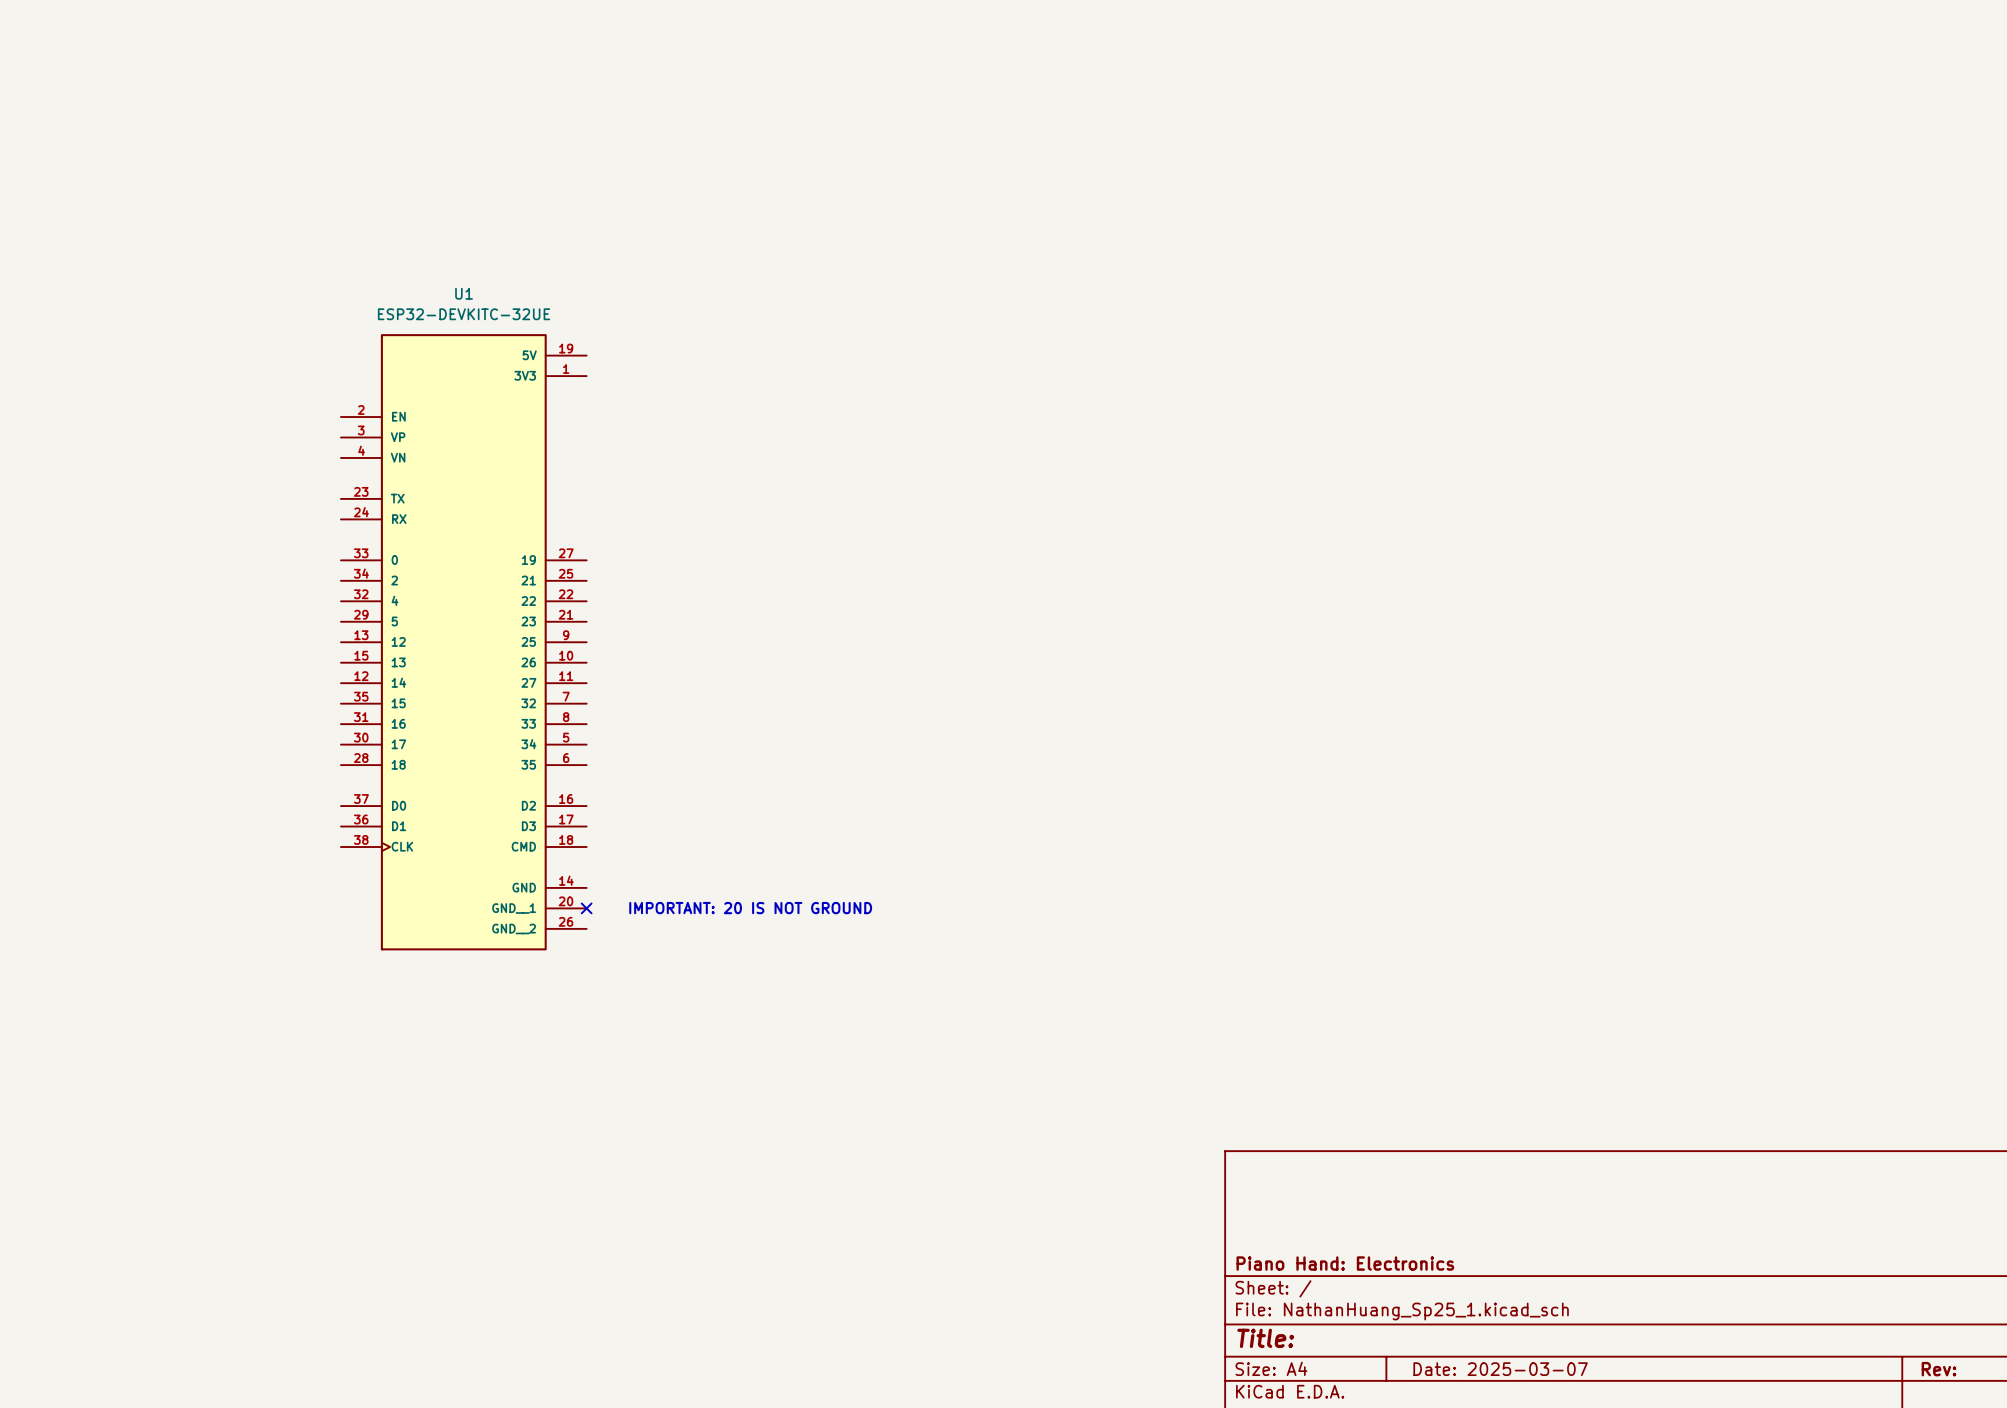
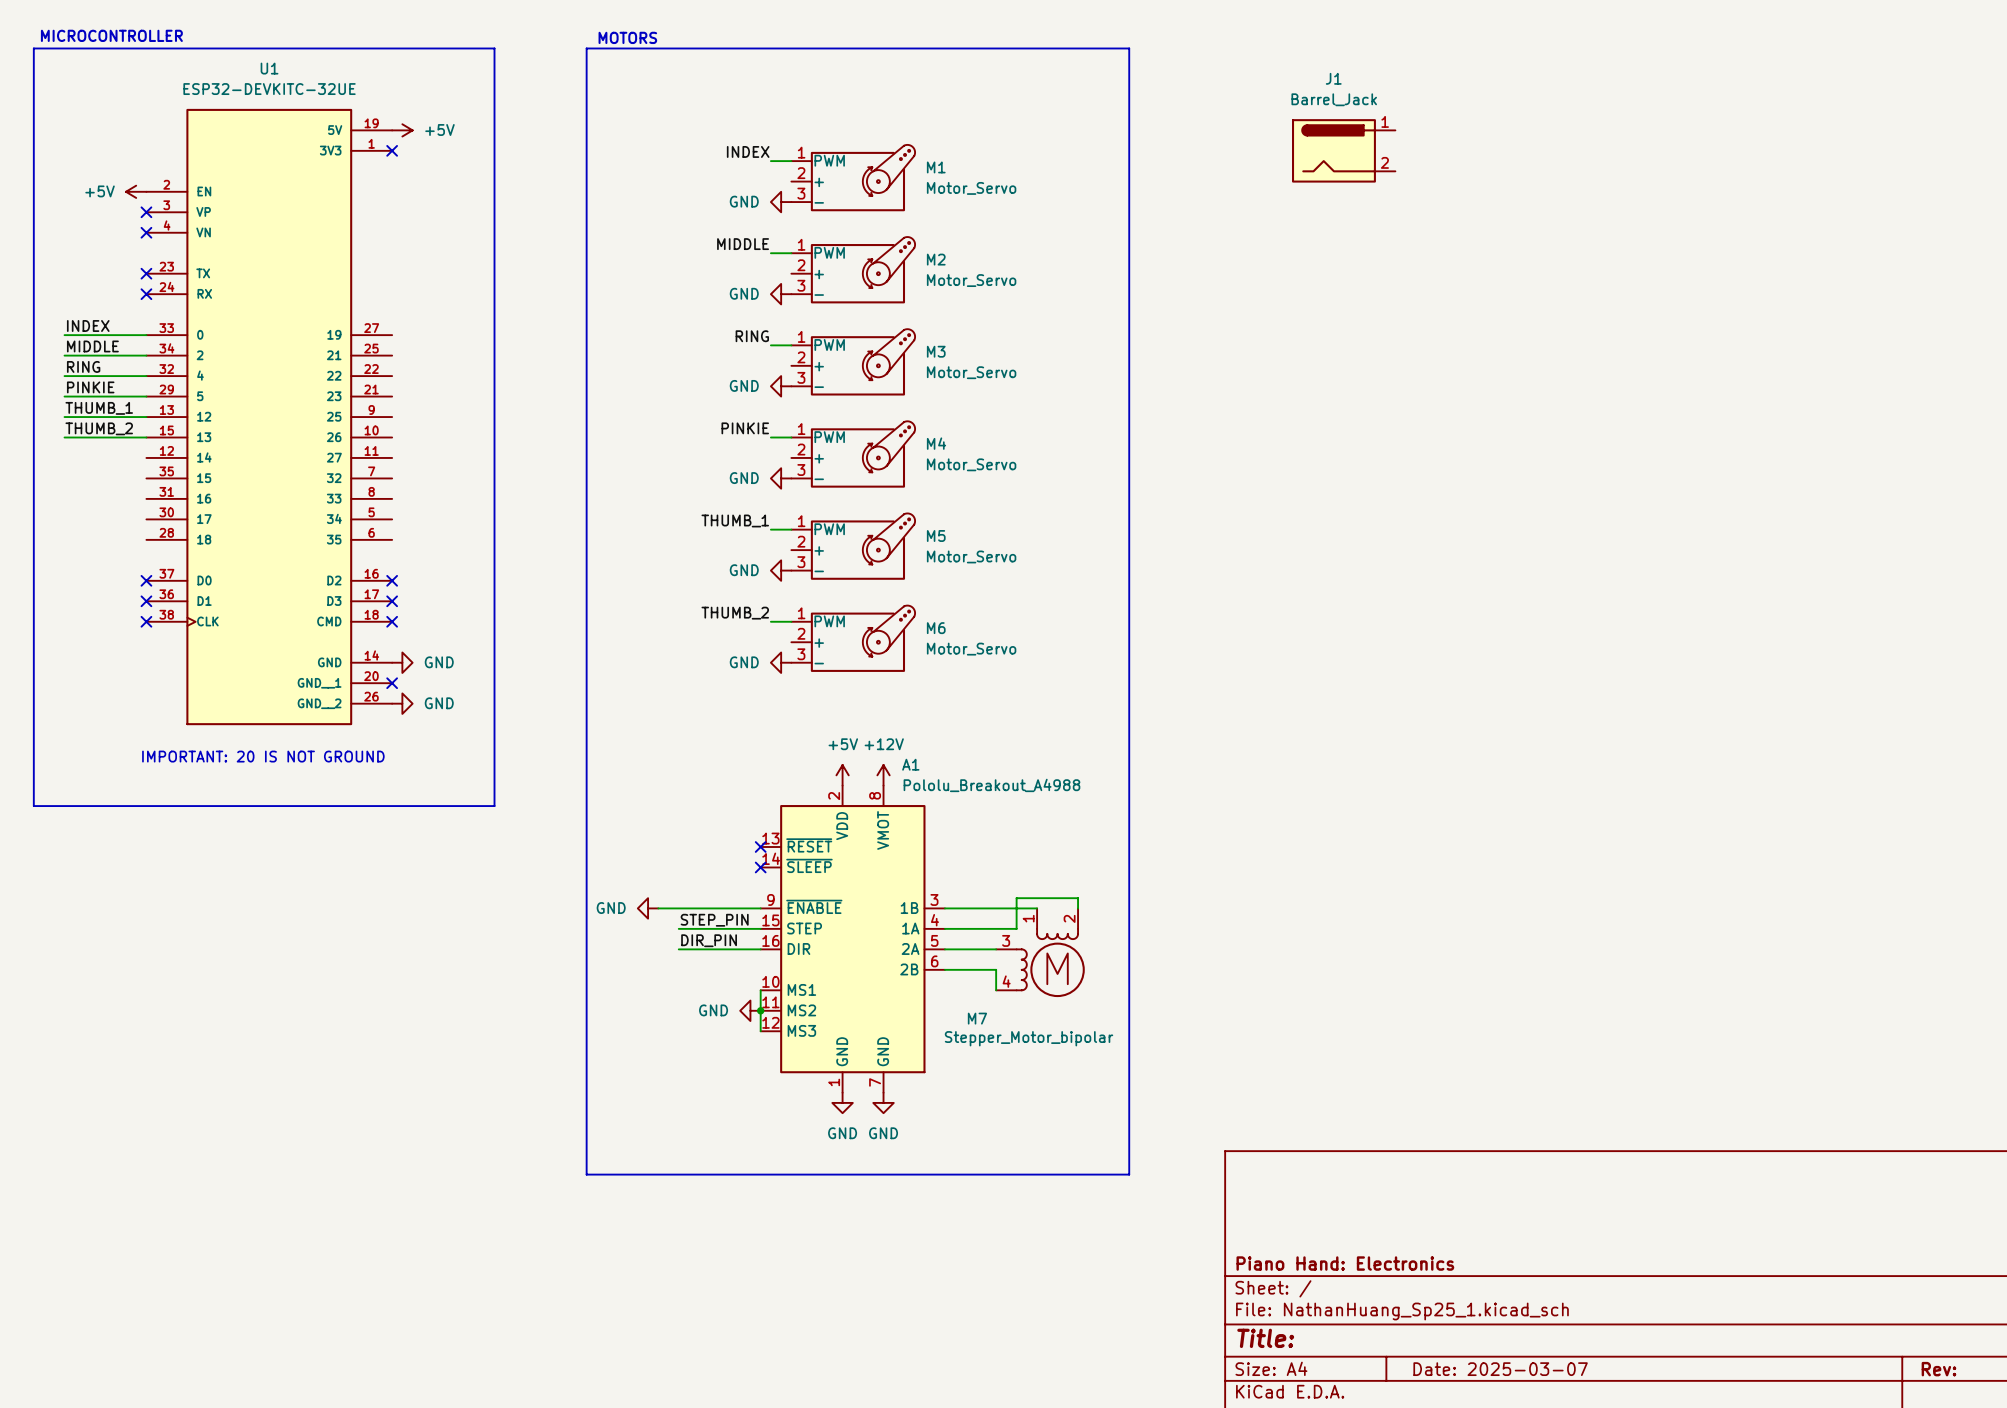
text: none -> MICROCONTROLLER (111, 35)
text: none -> MOTORS (627, 37)
line: none -> (33, 48) (494, 48) (494, 806) (33, 806) (33, 48)
line: none -> (586, 48) (1129, 48) (1129, 1174) (586, 1174) (586, 48)
power symbol: none -> +5V (402, 130)
no-connect mark: none -> (392, 150)
J1: none -> Barrel_Jack (1343, 150)
label: none -> INDEX (748, 151)
wire: none -> (770, 161) (791, 161)
M1: none -> Motor_Servo (853, 178)
power symbol: none -> +5V (136, 191)
power symbol: none -> GND (781, 202)
no-connect mark: none -> (146, 212)
no-connect mark: none -> (146, 232)
label: none -> MIDDLE (743, 244)
wire: none -> (770, 253) (791, 253)
M2: none -> Motor_Servo (853, 270)
no-connect mark: none -> (146, 273)
no-connect mark: none -> (146, 294)
power symbol: none -> GND (781, 294)
label: none -> INDEX (88, 325)
wire: none -> (64, 335) (146, 335)
label: none -> RING (752, 336)
wire: none -> (770, 345) (791, 345)
label: none -> MIDDLE (92, 346)
wire: none -> (64, 355) (146, 355)
M3: none -> Motor_Servo (853, 362)
label: none -> RING (83, 366)
wire: none -> (64, 376) (146, 376)
power symbol: none -> GND (781, 386)
label: none -> PINKIE (90, 387)
wire: none -> (64, 396) (146, 396)
label: none -> THUMB_1 (99, 408)
wire: none -> (64, 417) (146, 417)
label: none -> THUMB_2 (99, 428)
label: none -> PINKIE (745, 428)
wire: none -> (64, 437) (146, 437)
wire: none -> (770, 437) (791, 437)
M4: none -> Motor_Servo (853, 454)
power symbol: none -> GND (781, 478)
label: none -> THUMB_1 (735, 520)
wire: none -> (770, 529) (791, 529)
M5: none -> Motor_Servo (853, 546)
power symbol: none -> GND (781, 570)
no-connect mark: none -> (146, 580)
no-connect mark: none -> (392, 580)
no-connect mark: none -> (146, 601)
no-connect mark: none -> (392, 601)
label: none -> THUMB_2 (735, 613)
no-connect mark: none -> (146, 621)
no-connect mark: none -> (392, 621)
wire: none -> (770, 621) (791, 621)
M6: none -> Motor_Servo (853, 638)
U1 position: (463, 642) -> (269, 417)
power symbol: none -> GND (402, 662)
power symbol: none -> GND (781, 662)
no-connect mark: none -> (392, 683)
power symbol: none -> GND (402, 703)
text: none -> IMPORTANT: 20 IS NOT GROUND (263, 756)
power symbol: none -> +5V (842, 775)
power symbol: none -> +12V (883, 775)
no-connect mark: none -> (760, 847)
no-connect mark: none -> (760, 867)
no-connect mark: (586, 908) -> none
power symbol: none -> GND (648, 908)
wire: none -> (658, 908) (760, 908)
text: IMPORTANT: 20 IS NOT GROUND (750, 908) -> none
wire: none -> (944, 908) (1037, 908)
wire: none -> (1078, 908) (1078, 898) (1016, 898) (1016, 928) (944, 928)
label: none -> STEP_PIN (714, 920)
wire: none -> (678, 928) (760, 928)
A1: none -> Pololu_Breakout_A4988 (852, 939)
label: none -> DIR_PIN (709, 940)
wire: none -> (678, 949) (760, 949)
wire: none -> (944, 949) (996, 949)
M7: none -> Stepper_Motor_bipolar (1040, 952)
wire: none -> (944, 969) (996, 969) (996, 990)
wire: none -> (760, 990) (760, 1031)
power symbol: none -> GND (750, 1010)
junction: none -> (760, 1010)
power symbol: none -> GND (842, 1102)
power symbol: none -> GND (883, 1102)

